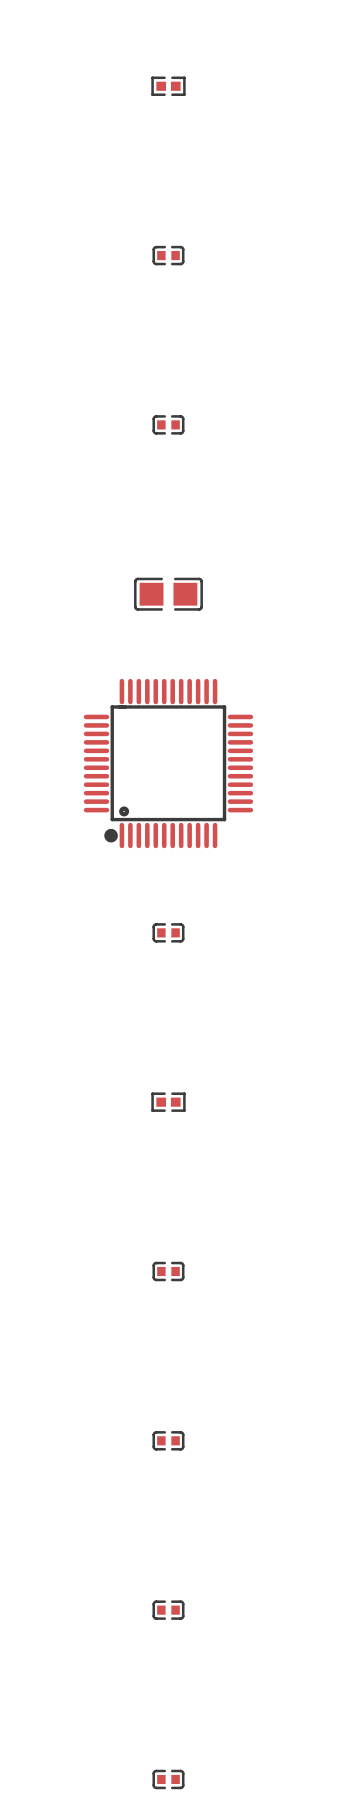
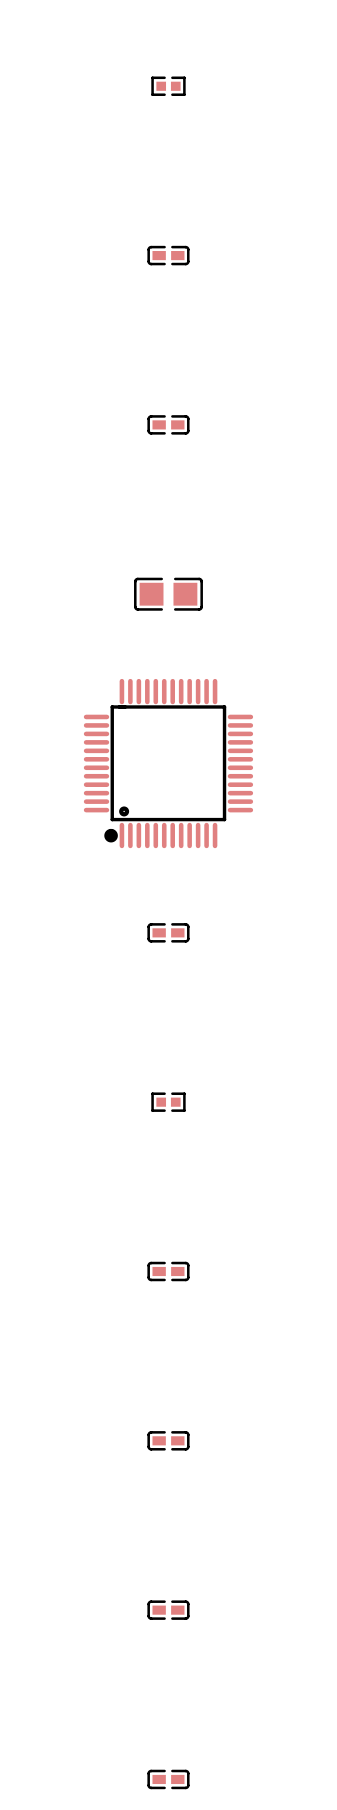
part footprint: [152, 245, 185, 266] -> [147, 245, 190, 266]
part footprint: [152, 415, 185, 435] -> [147, 415, 190, 435]
part footprint: [152, 923, 185, 943] -> [147, 923, 190, 943]
part footprint: [152, 1261, 185, 1282] -> [147, 1261, 190, 1282]
part footprint: [152, 1431, 185, 1451] -> [147, 1431, 190, 1451]
part footprint: [152, 1600, 185, 1620] -> [147, 1600, 190, 1620]
part footprint: [152, 1769, 185, 1790] -> [147, 1769, 190, 1790]

